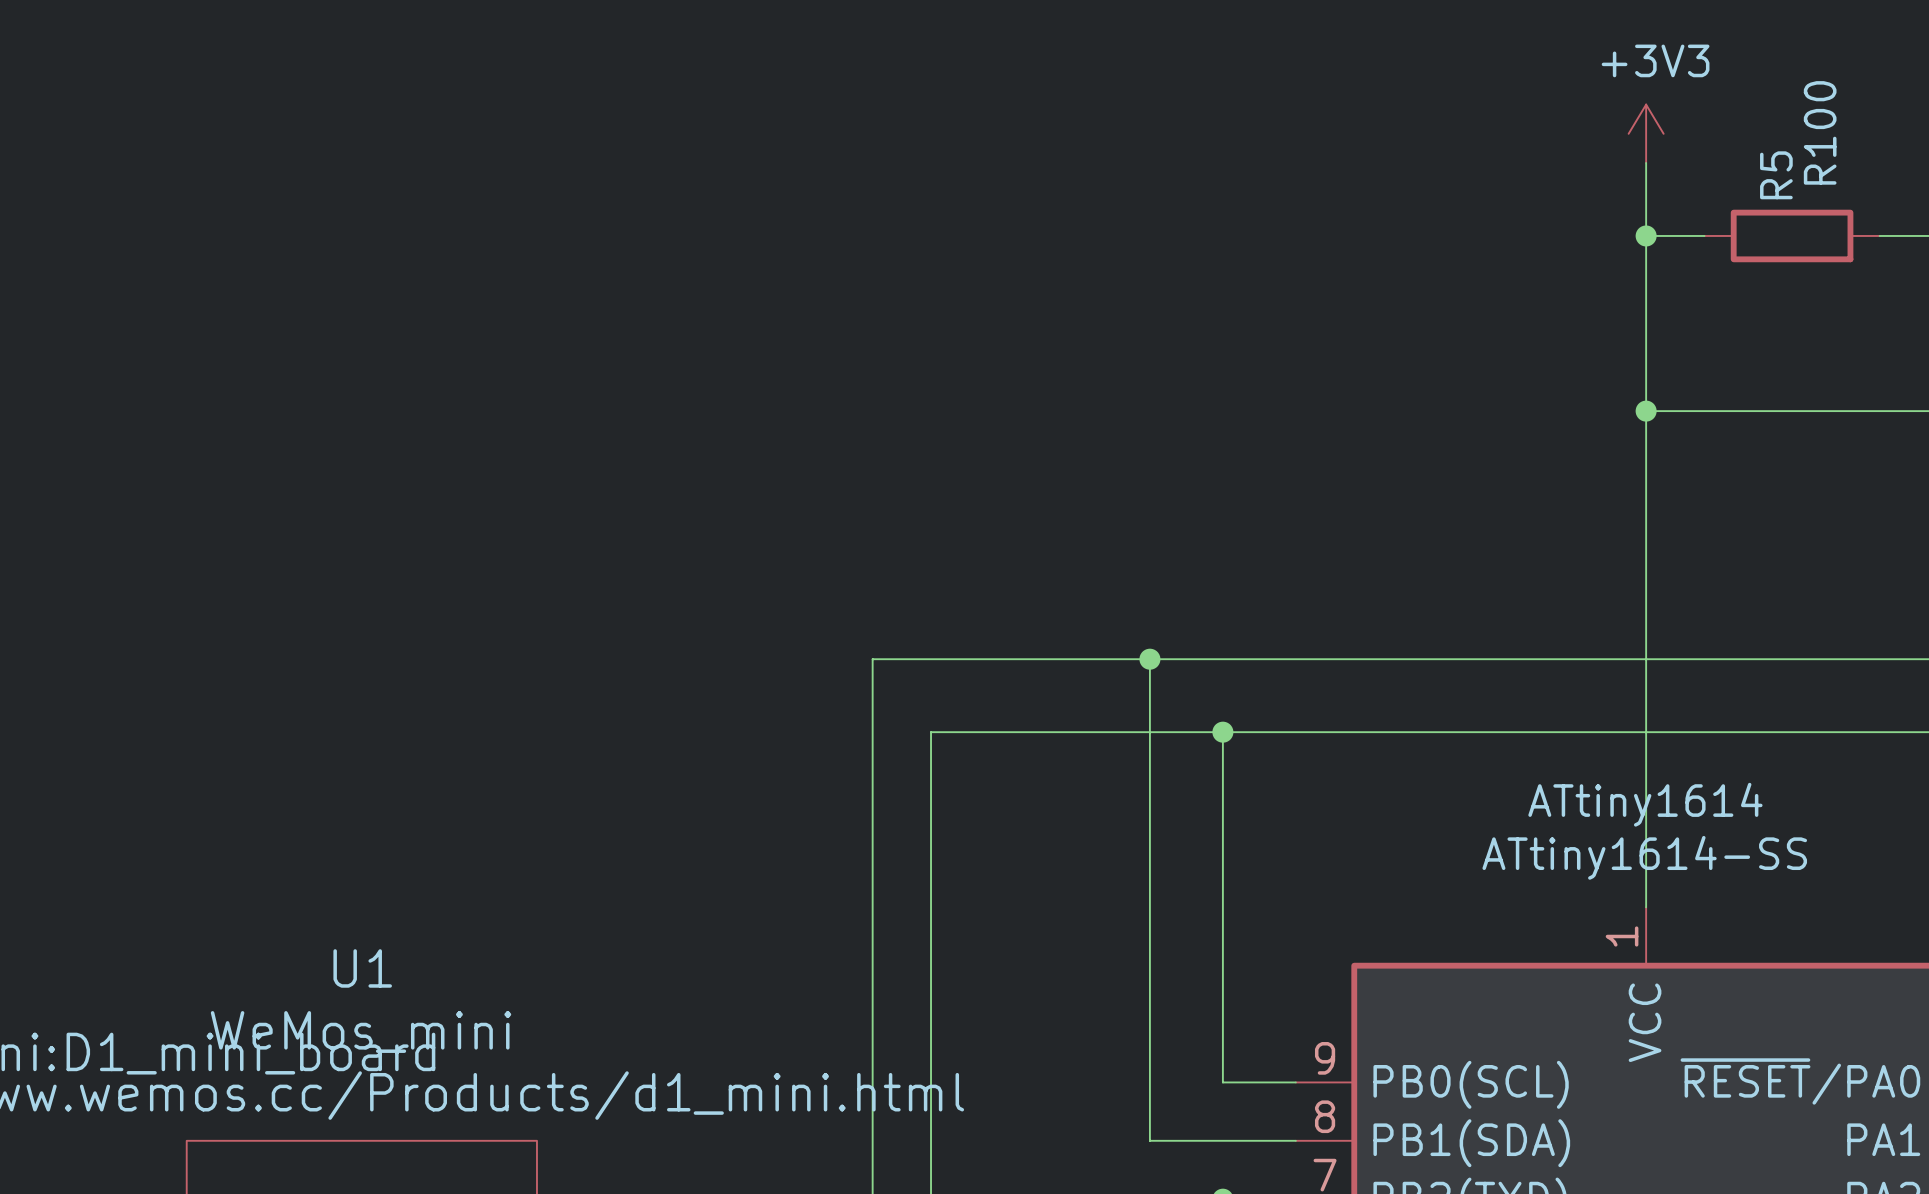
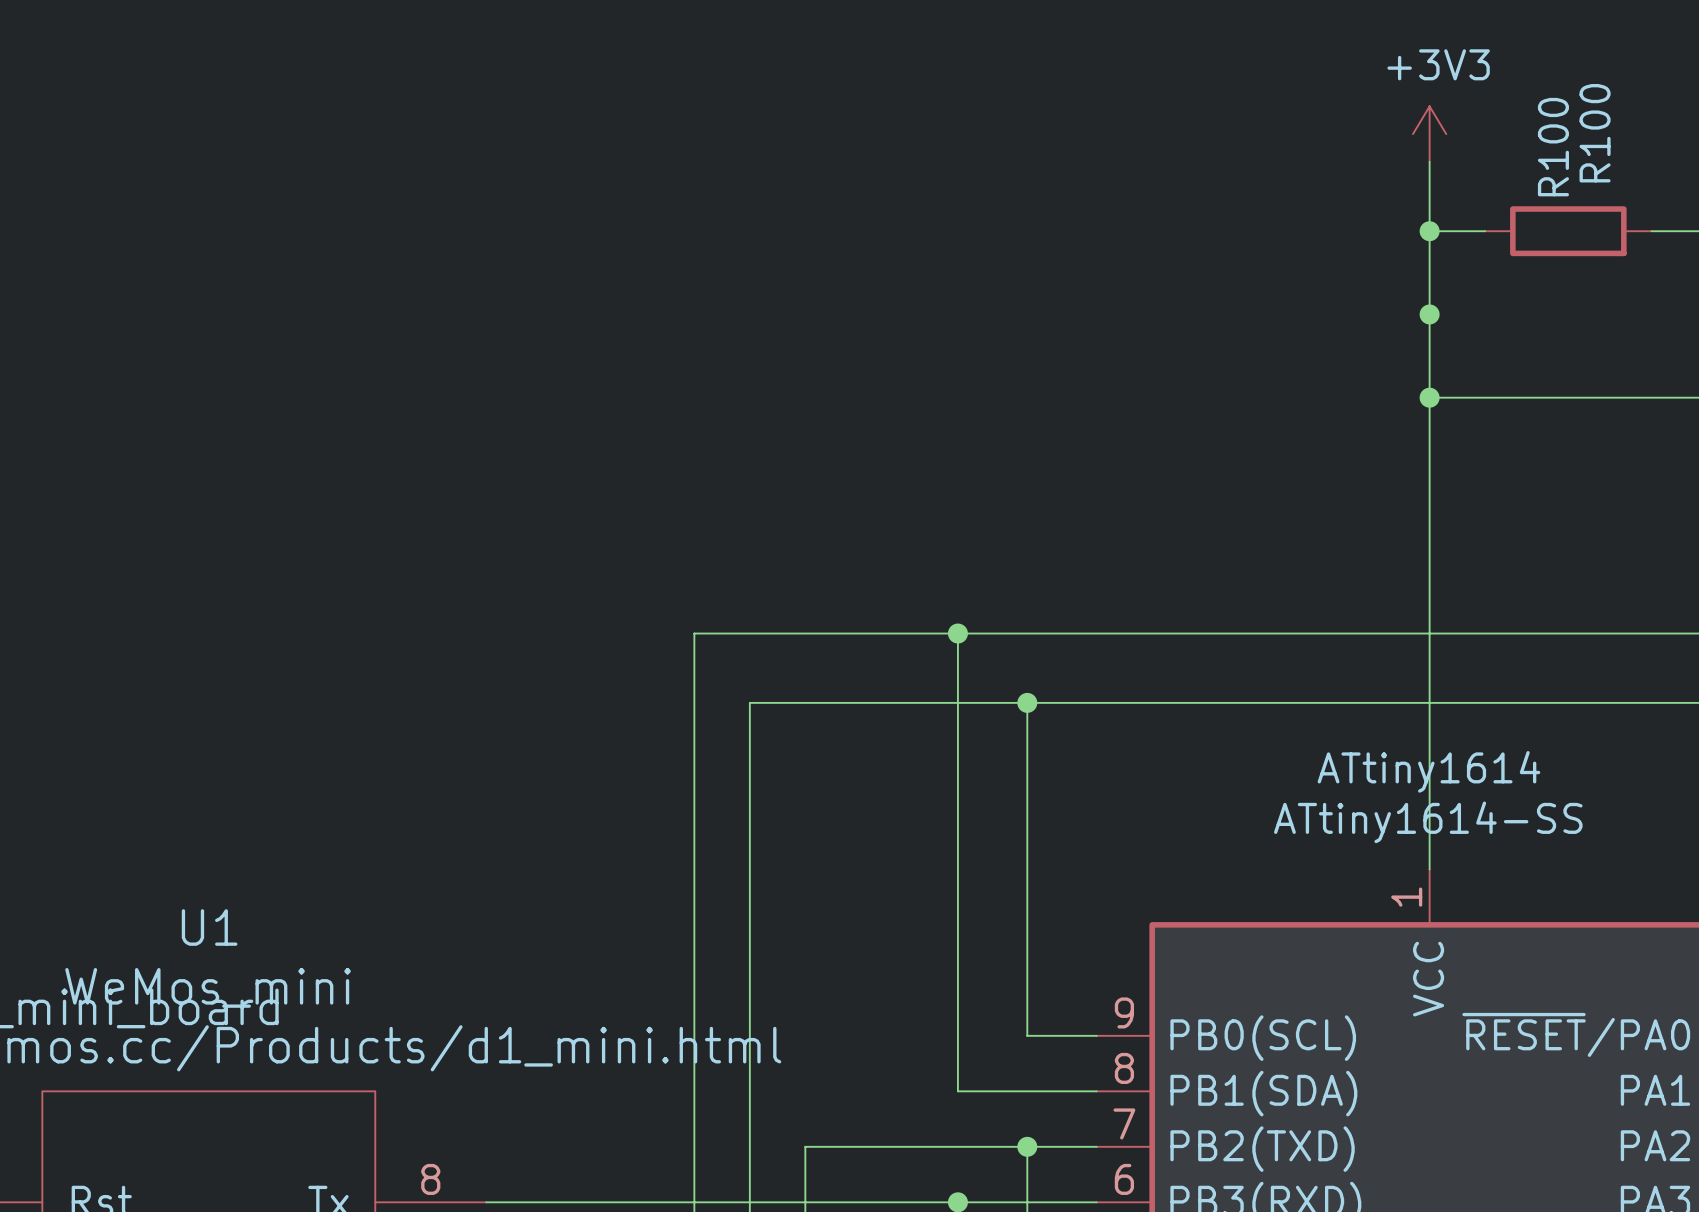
R5 name: R5 (1776, 175) -> R100 (1553, 147)
junction: none -> (1429, 314)

